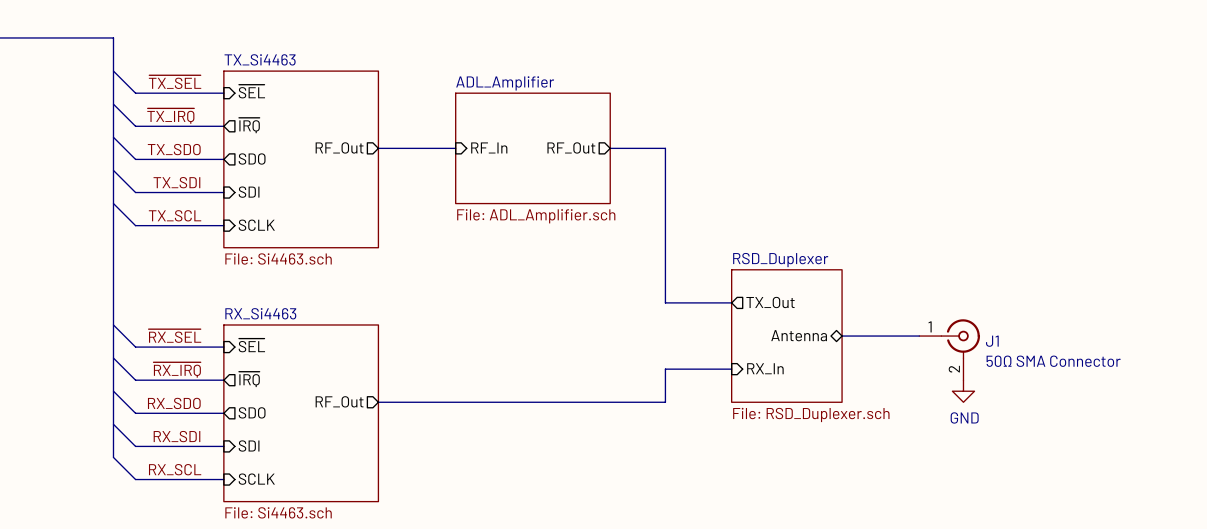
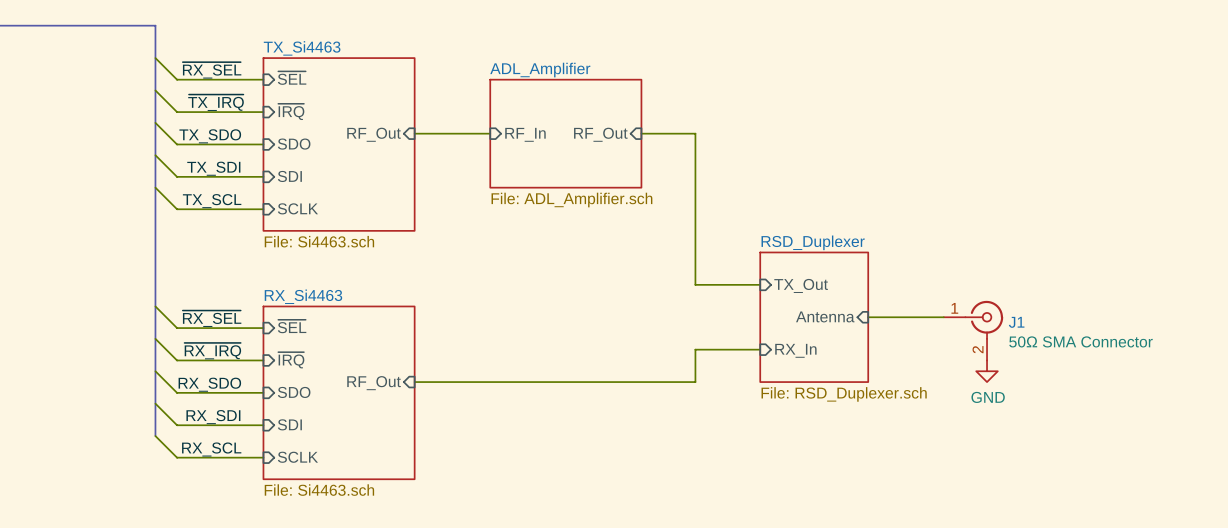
label: ~{TX_SEL} (175, 82) -> ~{RX_SEL} (212, 70)
sheet pin shape: output (249, 125) -> input (291, 111)
sheet pin shape: output (339, 147) -> input (374, 134)
sheet pin shape: output (571, 147) -> input (600, 134)
sheet pin shape: output (252, 159) -> input (294, 144)
sheet pin shape: output (770, 302) -> input (801, 285)
sheet pin shape: bidirectional (799, 335) -> input (825, 316)
sheet pin shape: output (249, 379) -> input (291, 360)
sheet pin shape: output (339, 401) -> input (374, 383)
sheet pin shape: output (252, 412) -> input (294, 392)

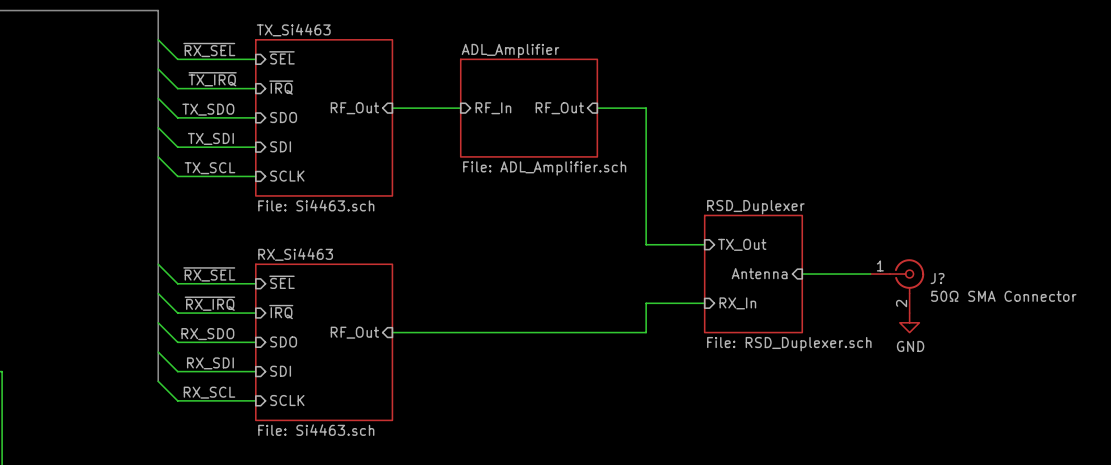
J1 name: J1 (1016, 322) -> J? (937, 278)

